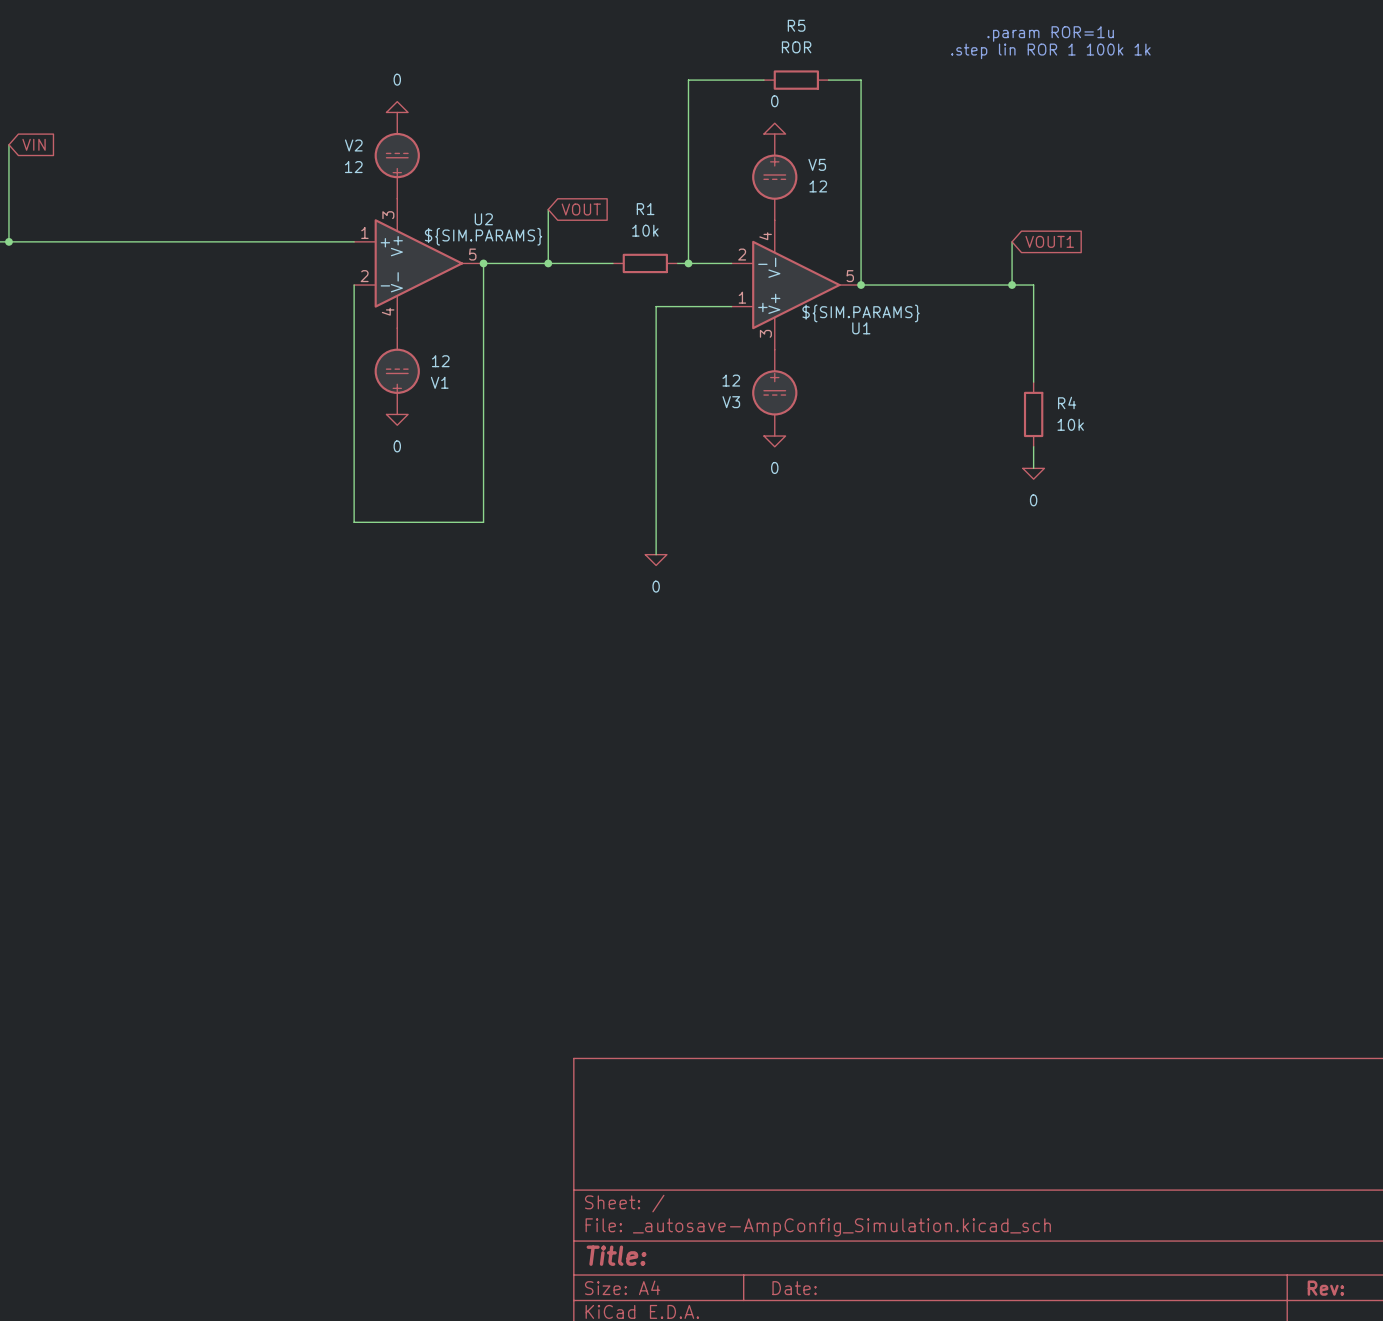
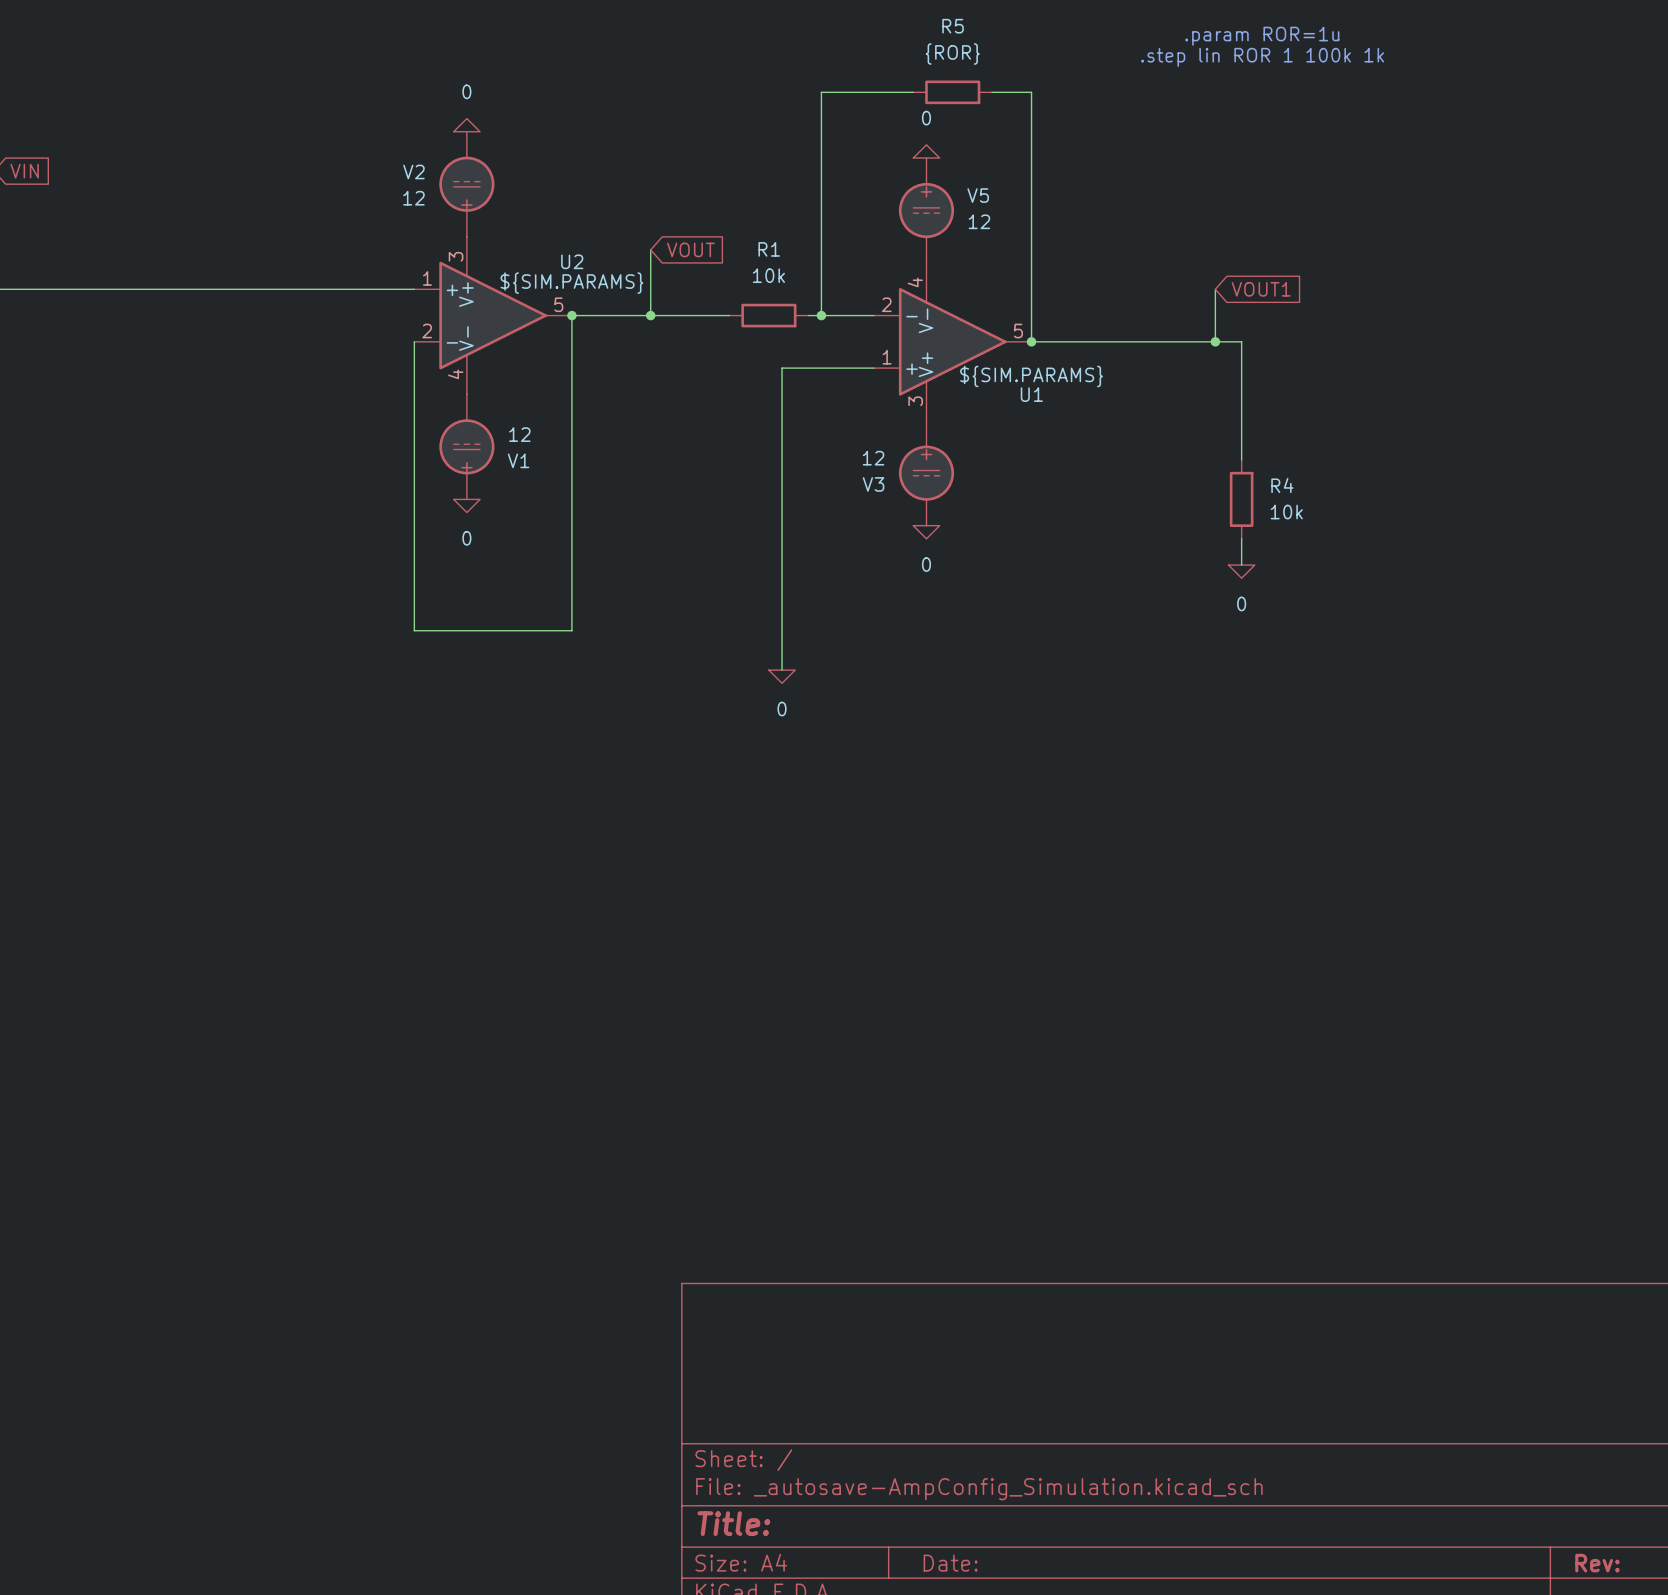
R5 value: ROR (796, 47) -> {ROR} (952, 54)

